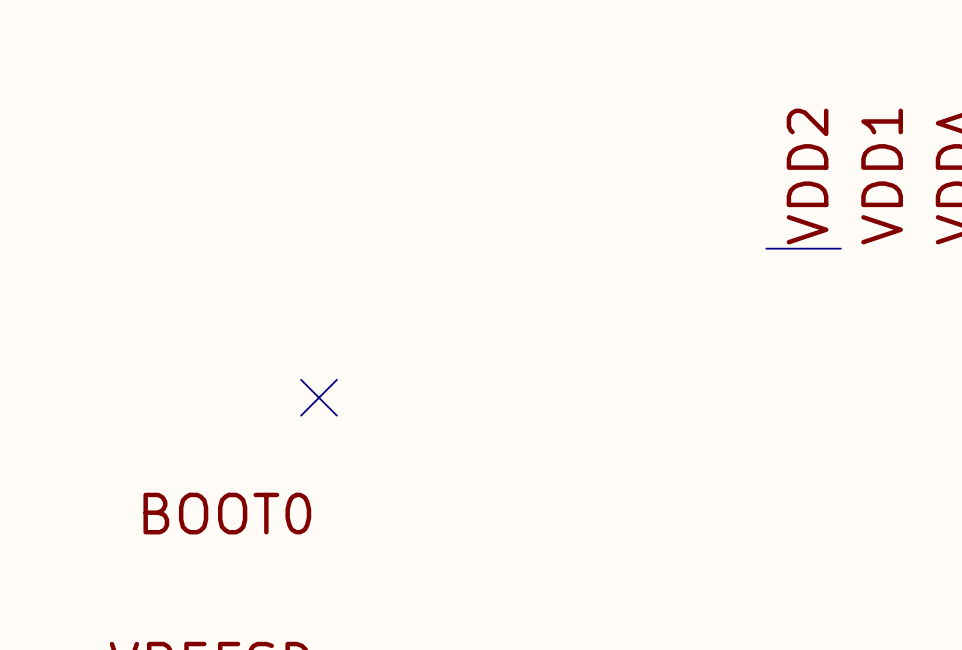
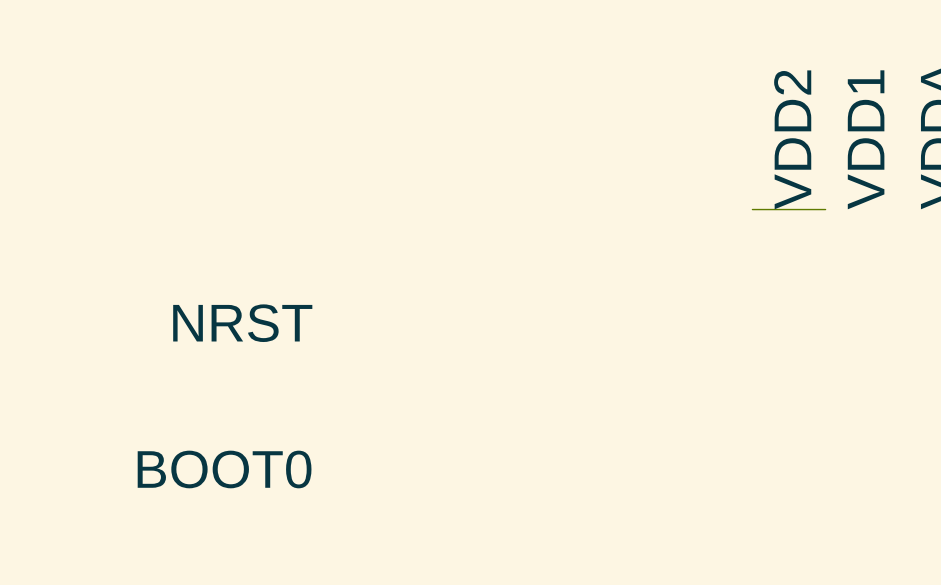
label: none -> NRST (242, 323)
no-connect mark: (319, 397) -> none

